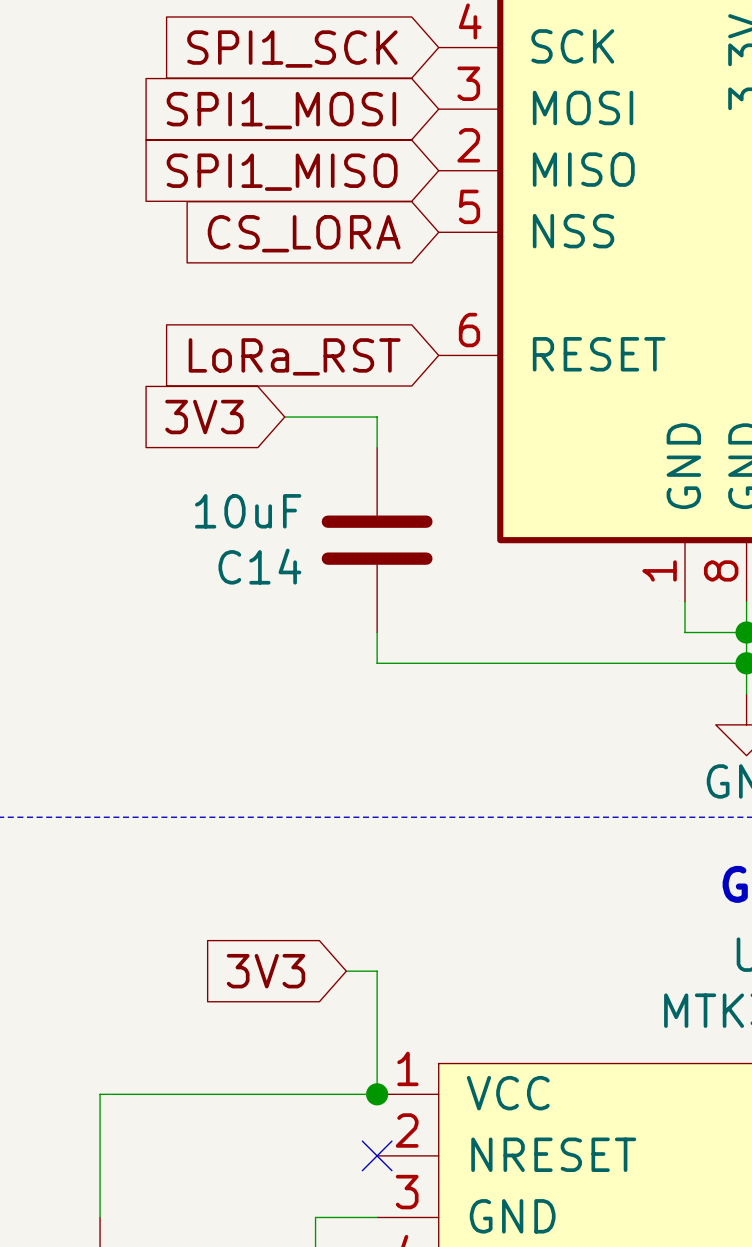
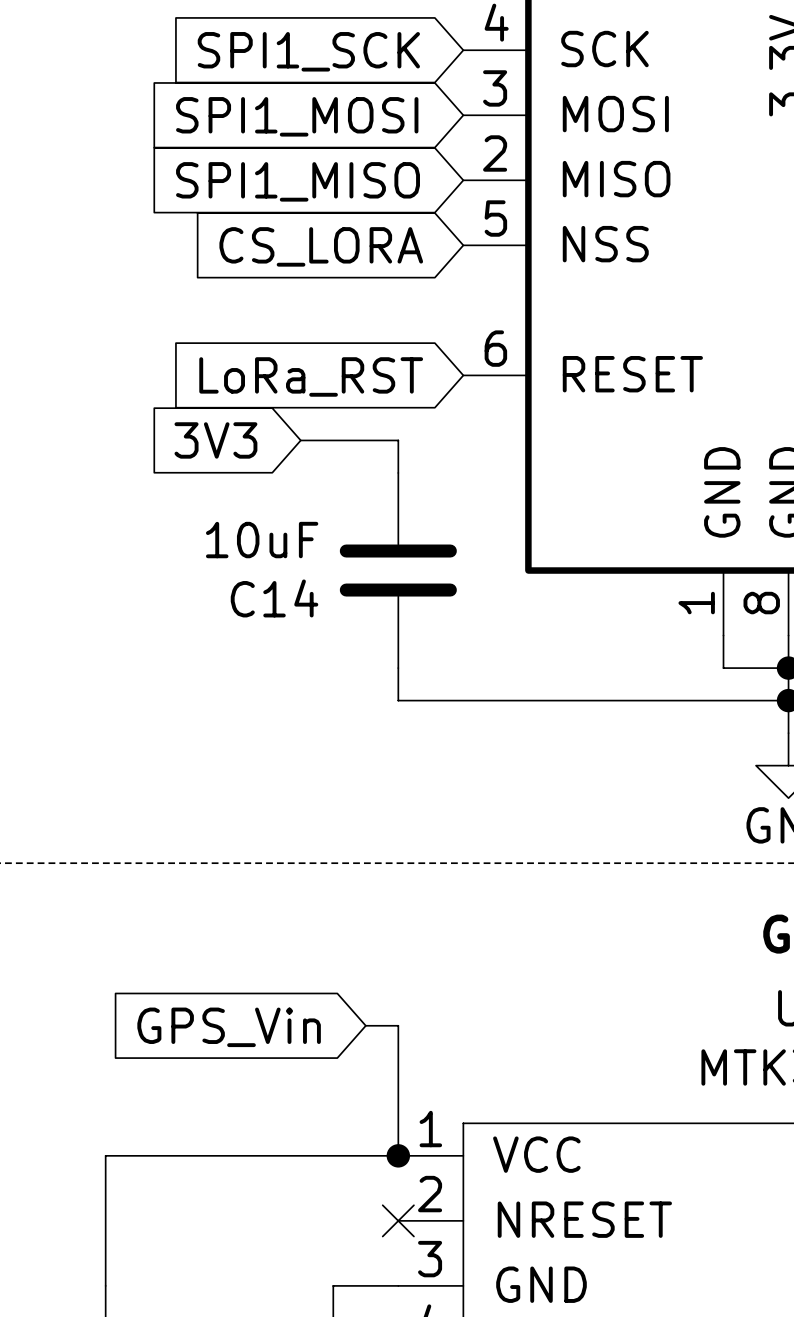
global label: 3V3 (266, 971) -> GPS_Vin (229, 1027)

